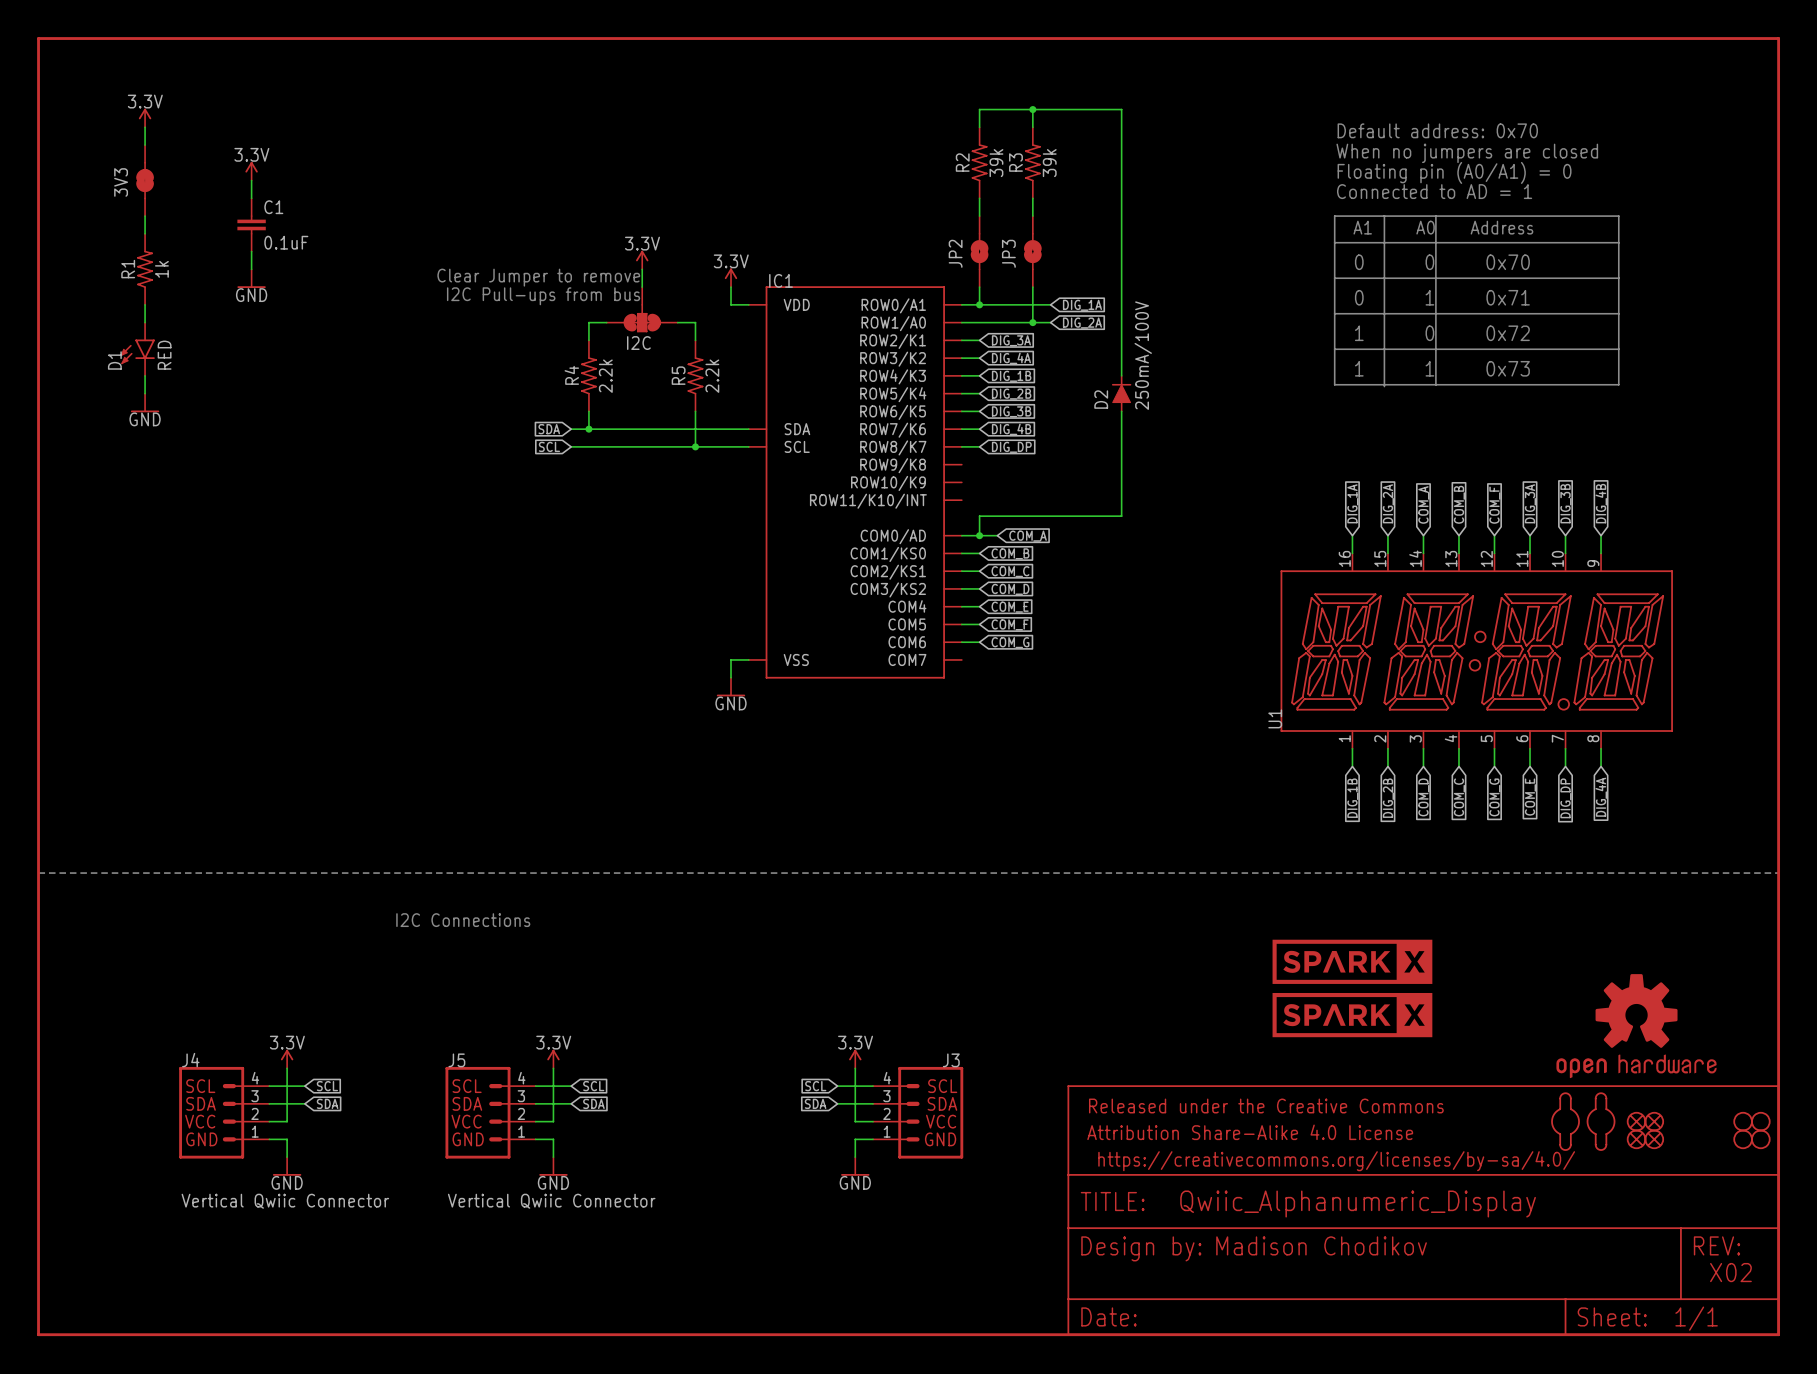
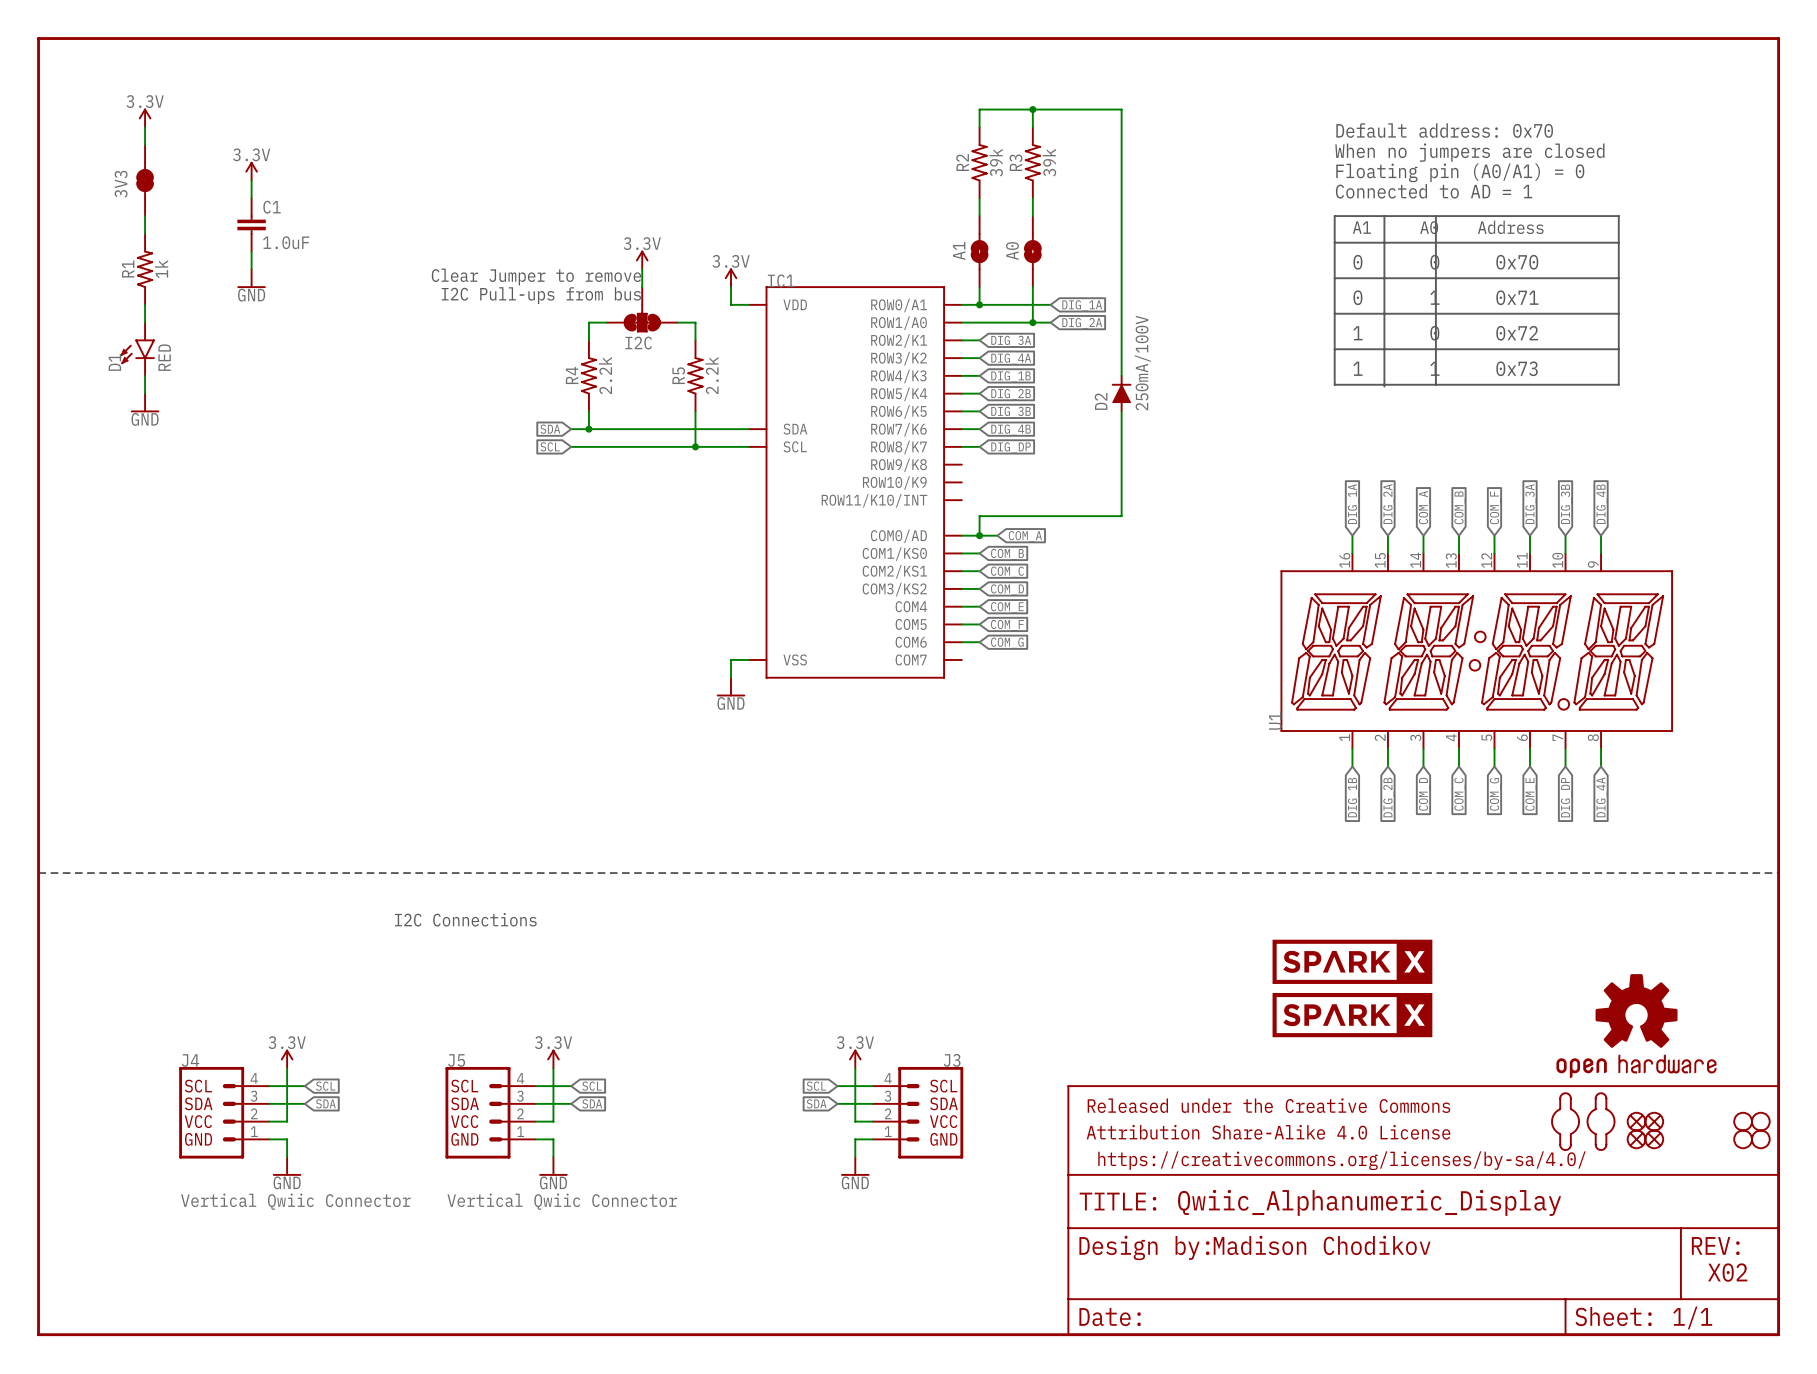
C1 value: 0.1uF (286, 242) -> 1.0uF (286, 242)
JP2 name: JP2 (955, 253) -> A1 (959, 250)
JP3 name: JP3 (1008, 253) -> A0 (1012, 251)

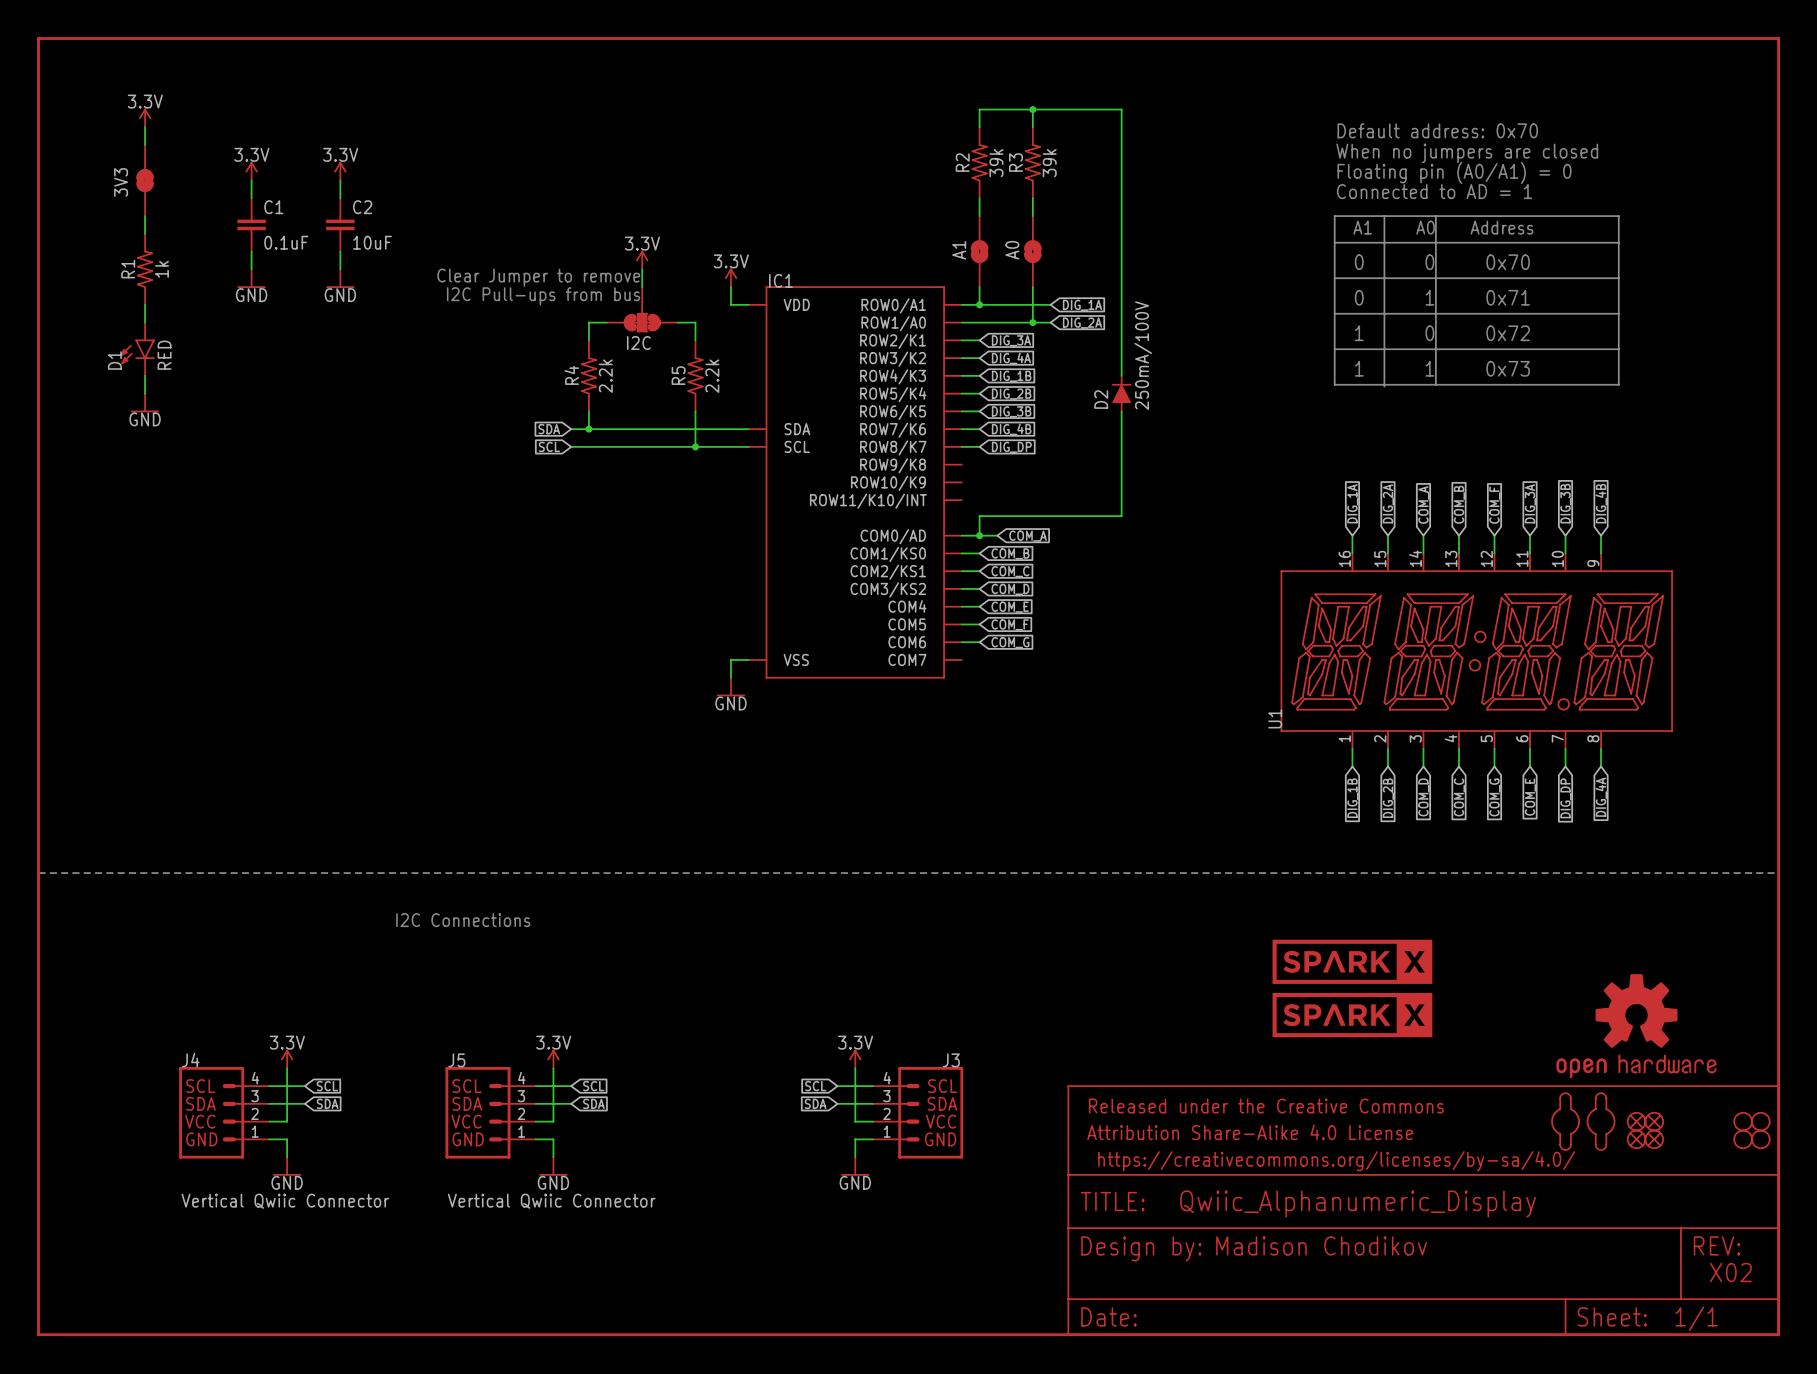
power symbol: none -> 3.3V (340, 171)
wire: none -> (340, 180) (340, 198)
C2: none -> 10uF (340, 224)
C1 value: 1.0uF (286, 242) -> 0.1uF (286, 242)
wire: none -> (340, 251) (340, 269)
power symbol: none -> GND (340, 278)

